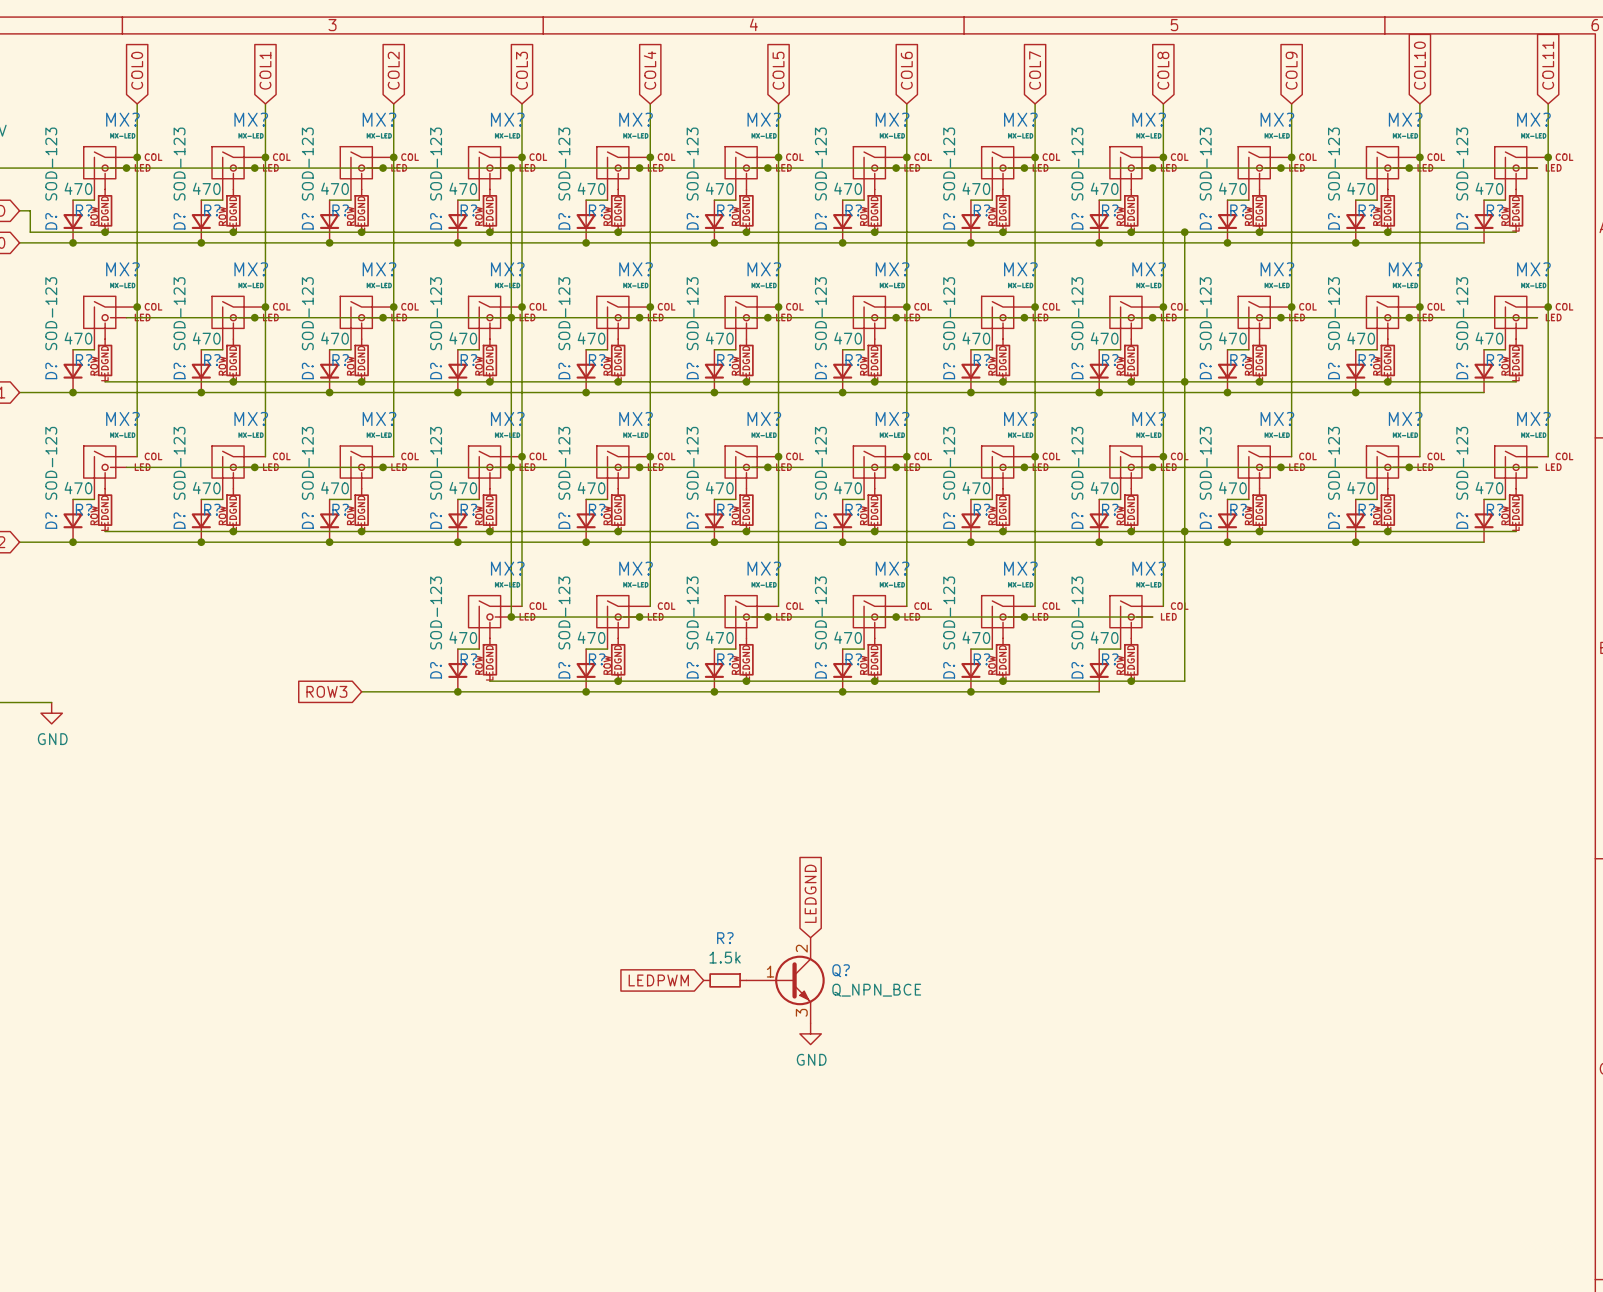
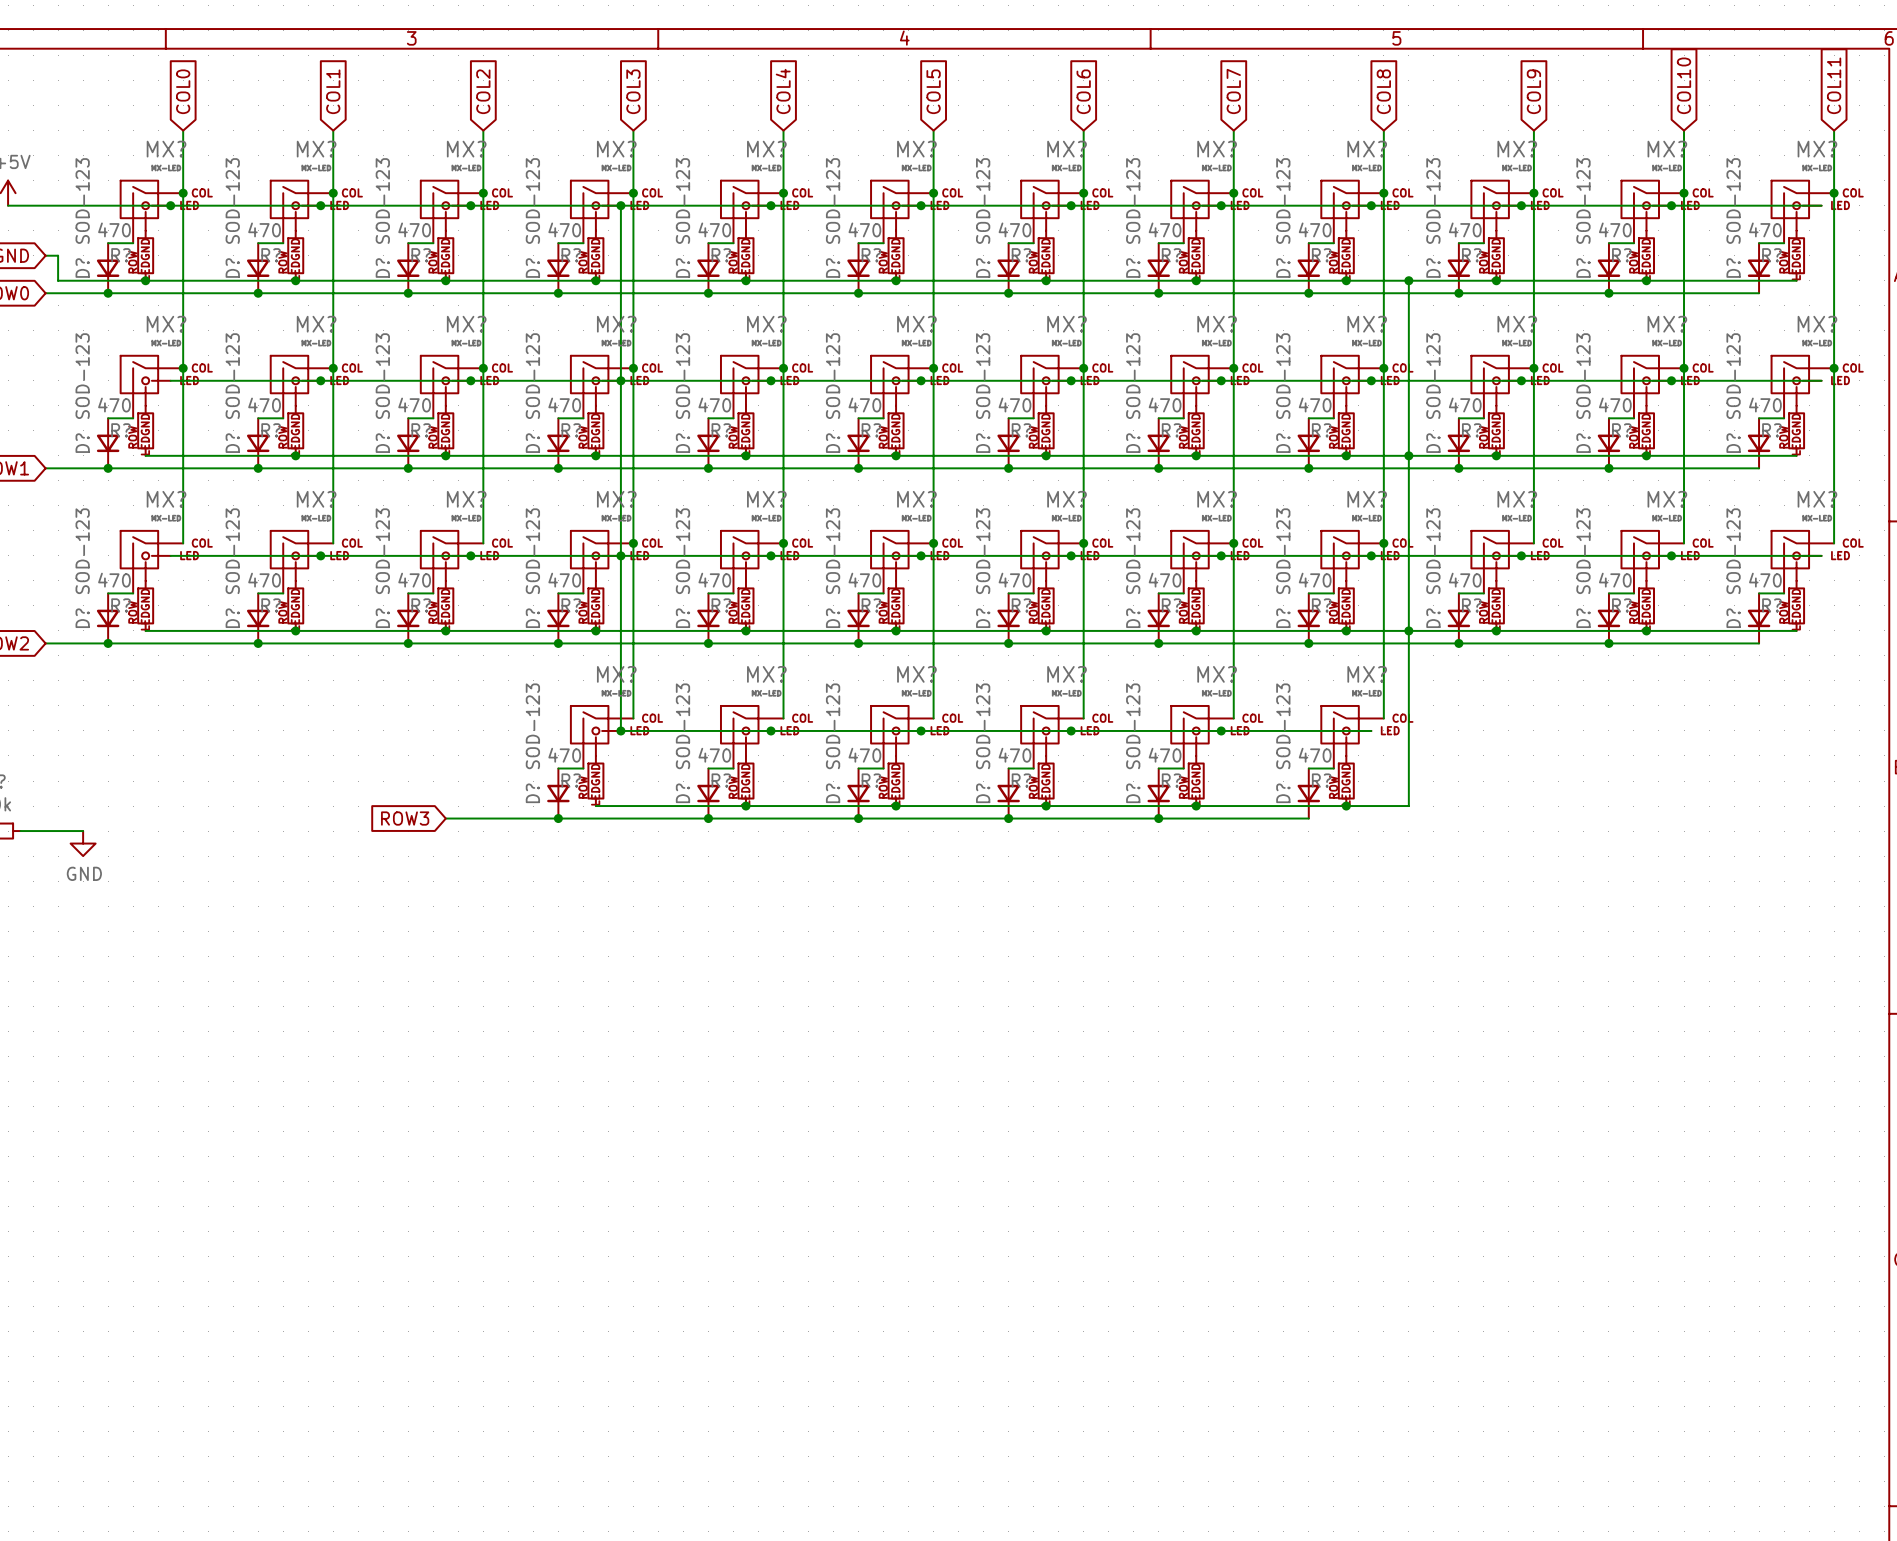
global label: LEDGND (810, 893) -> none
global label: LEDPWM (658, 980) -> none
R?: 1.5k (725, 980) -> none
Q?: Q_NPN_BCE (785, 980) -> none
power symbol: GND (810, 1033) -> none

